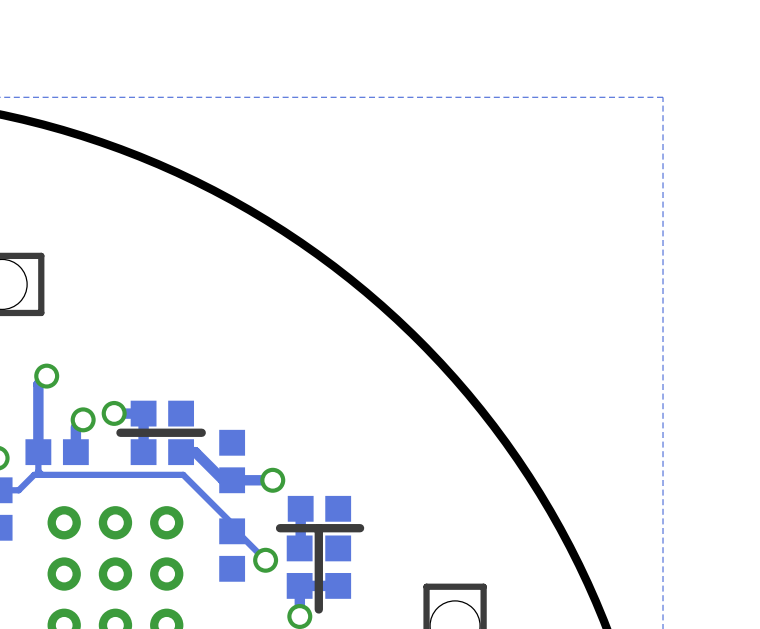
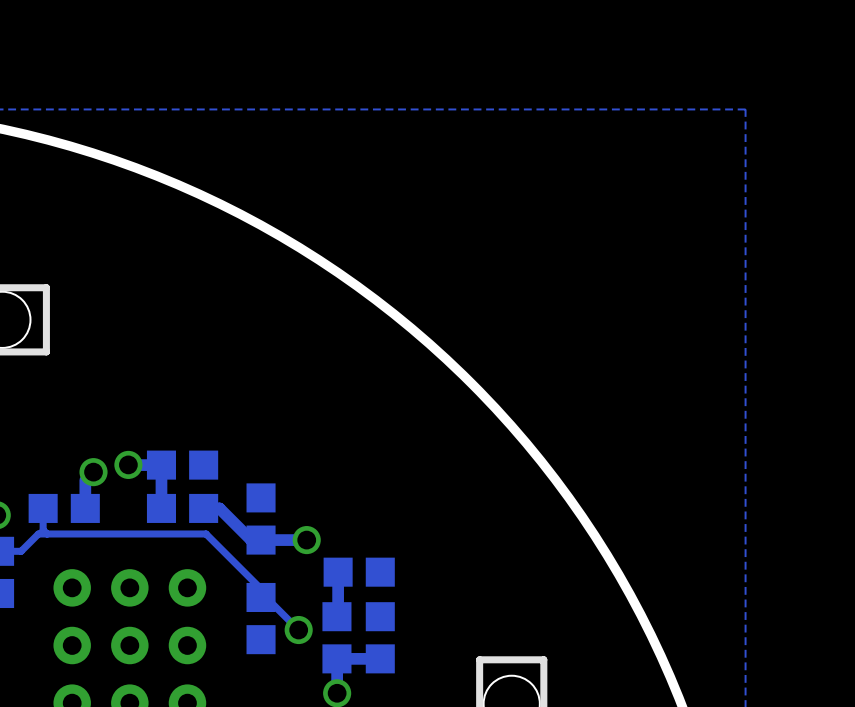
track: (46, 376) (38, 384) (38, 452) -> none
via: (46, 376) -> none
line: (201, 432) (120, 432) -> none
line: (318, 528) (318, 609) -> none
line: (360, 528) (280, 528) -> none

